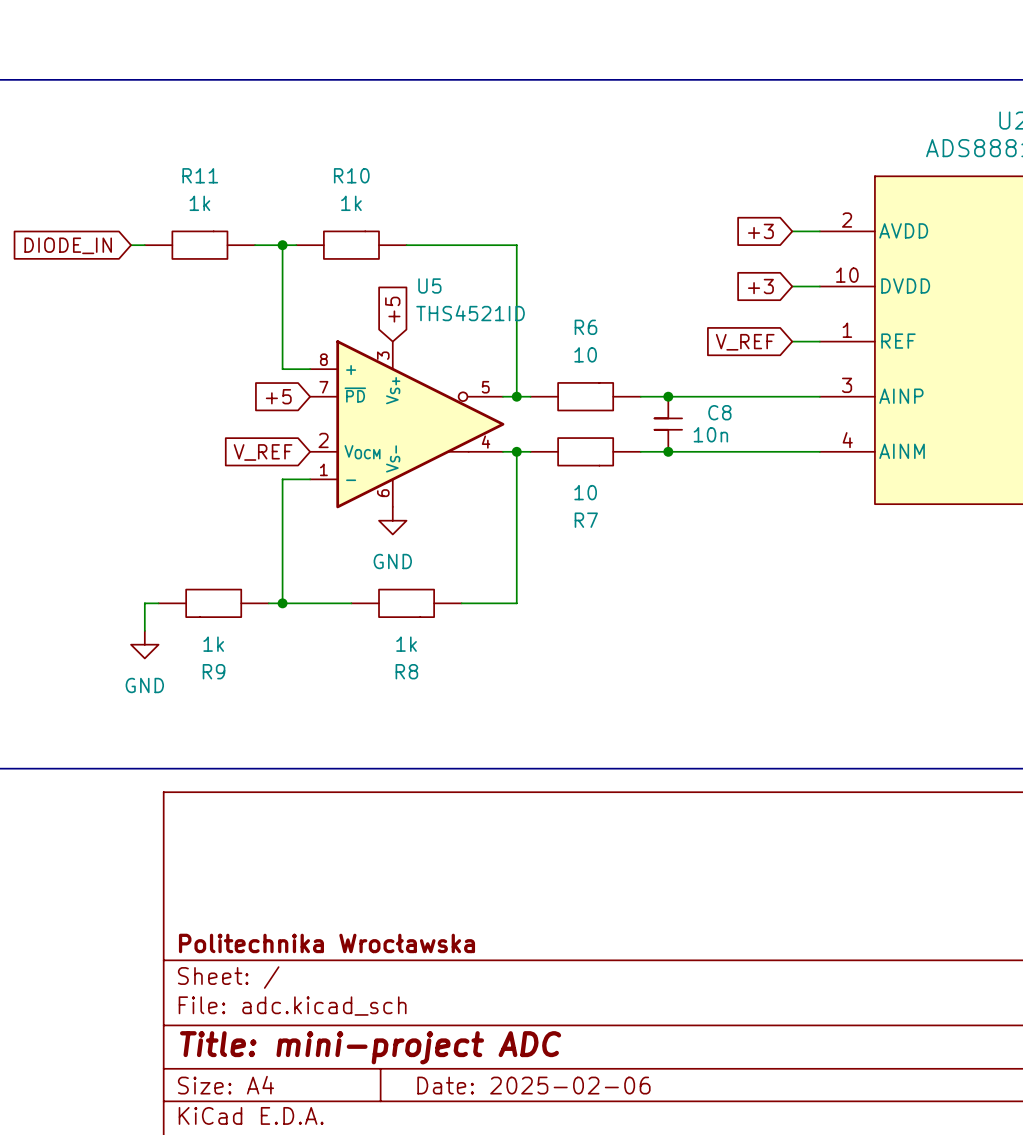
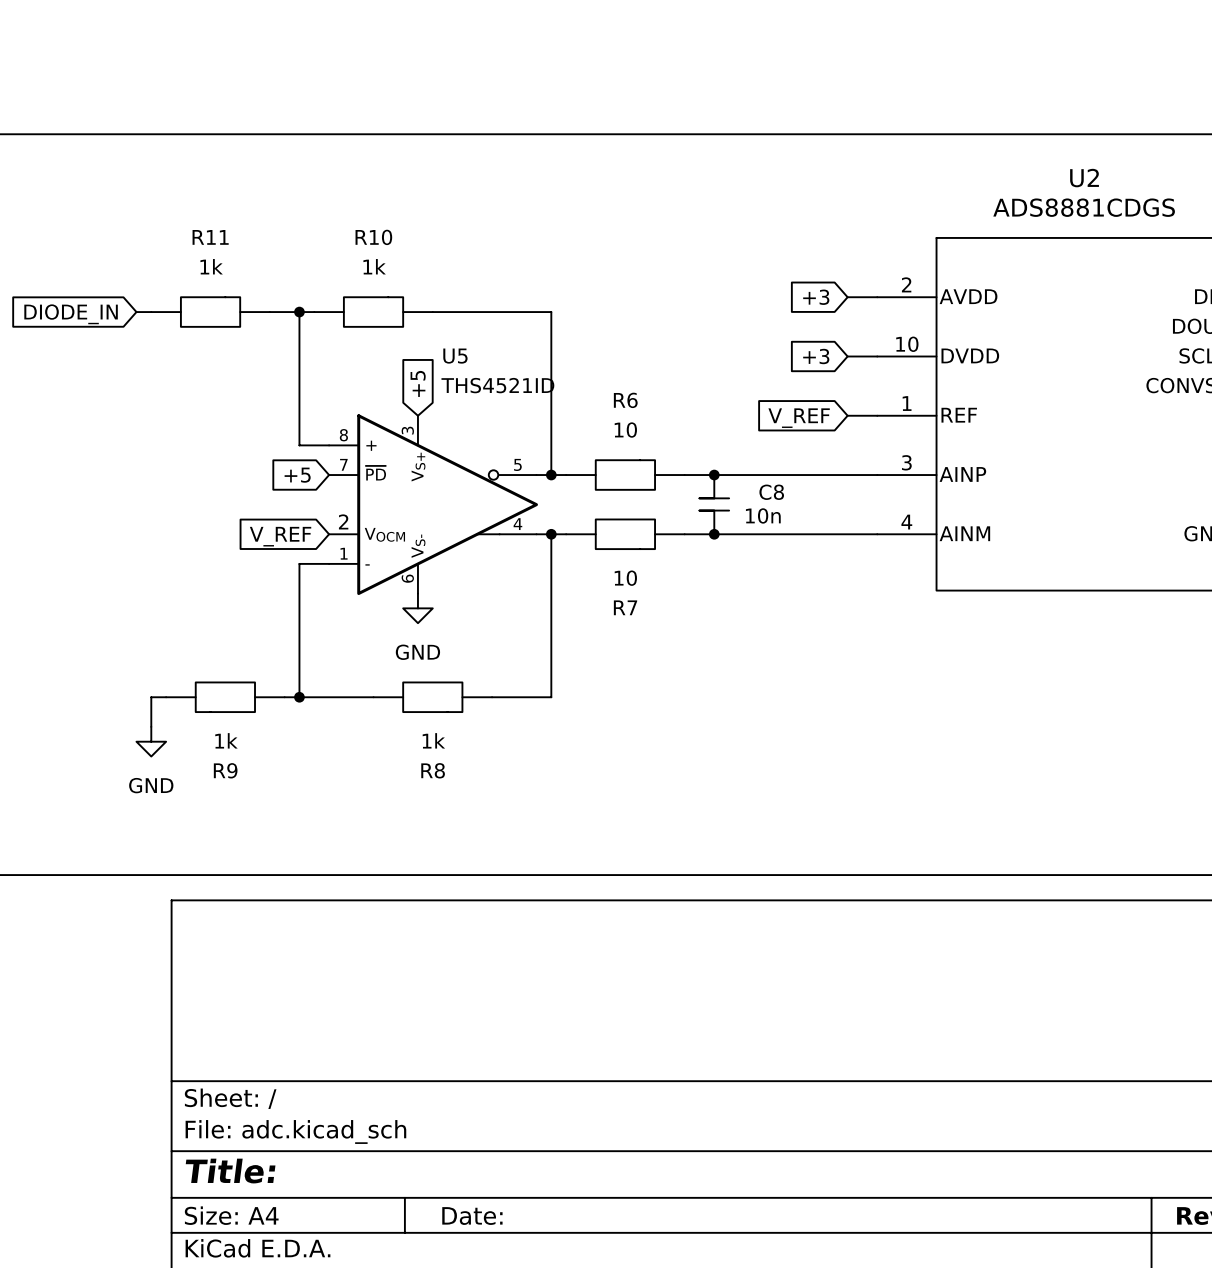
title block: Politechnika Wrocławska (326, 943) -> none
title block: Title: mini-project ADC (370, 1047) -> Title: (230, 1171)
title block: Date: 2025-02-06 (533, 1085) -> Date: (472, 1216)

